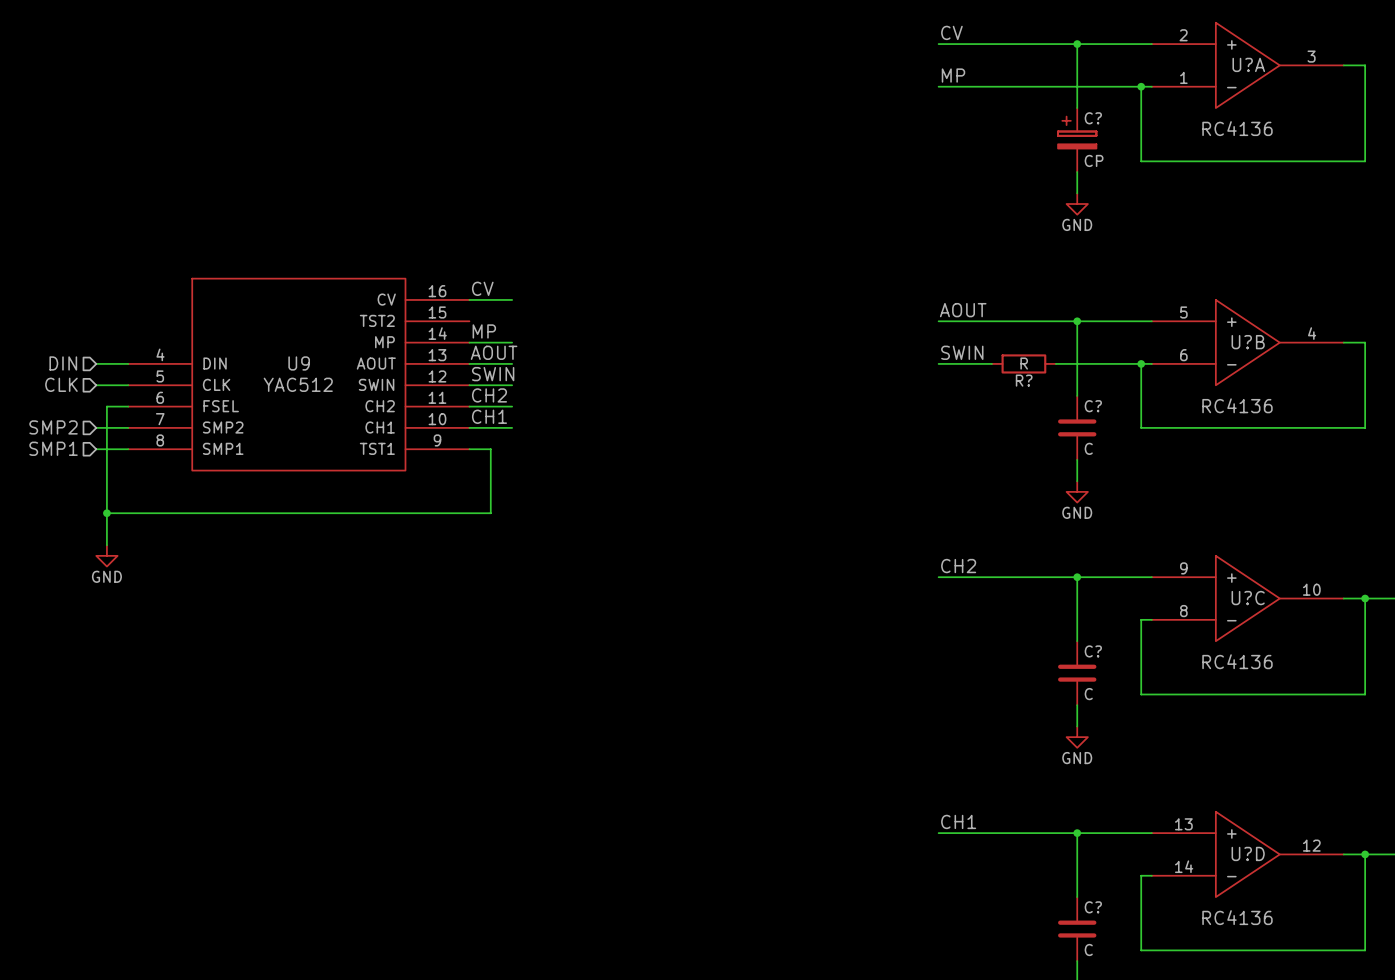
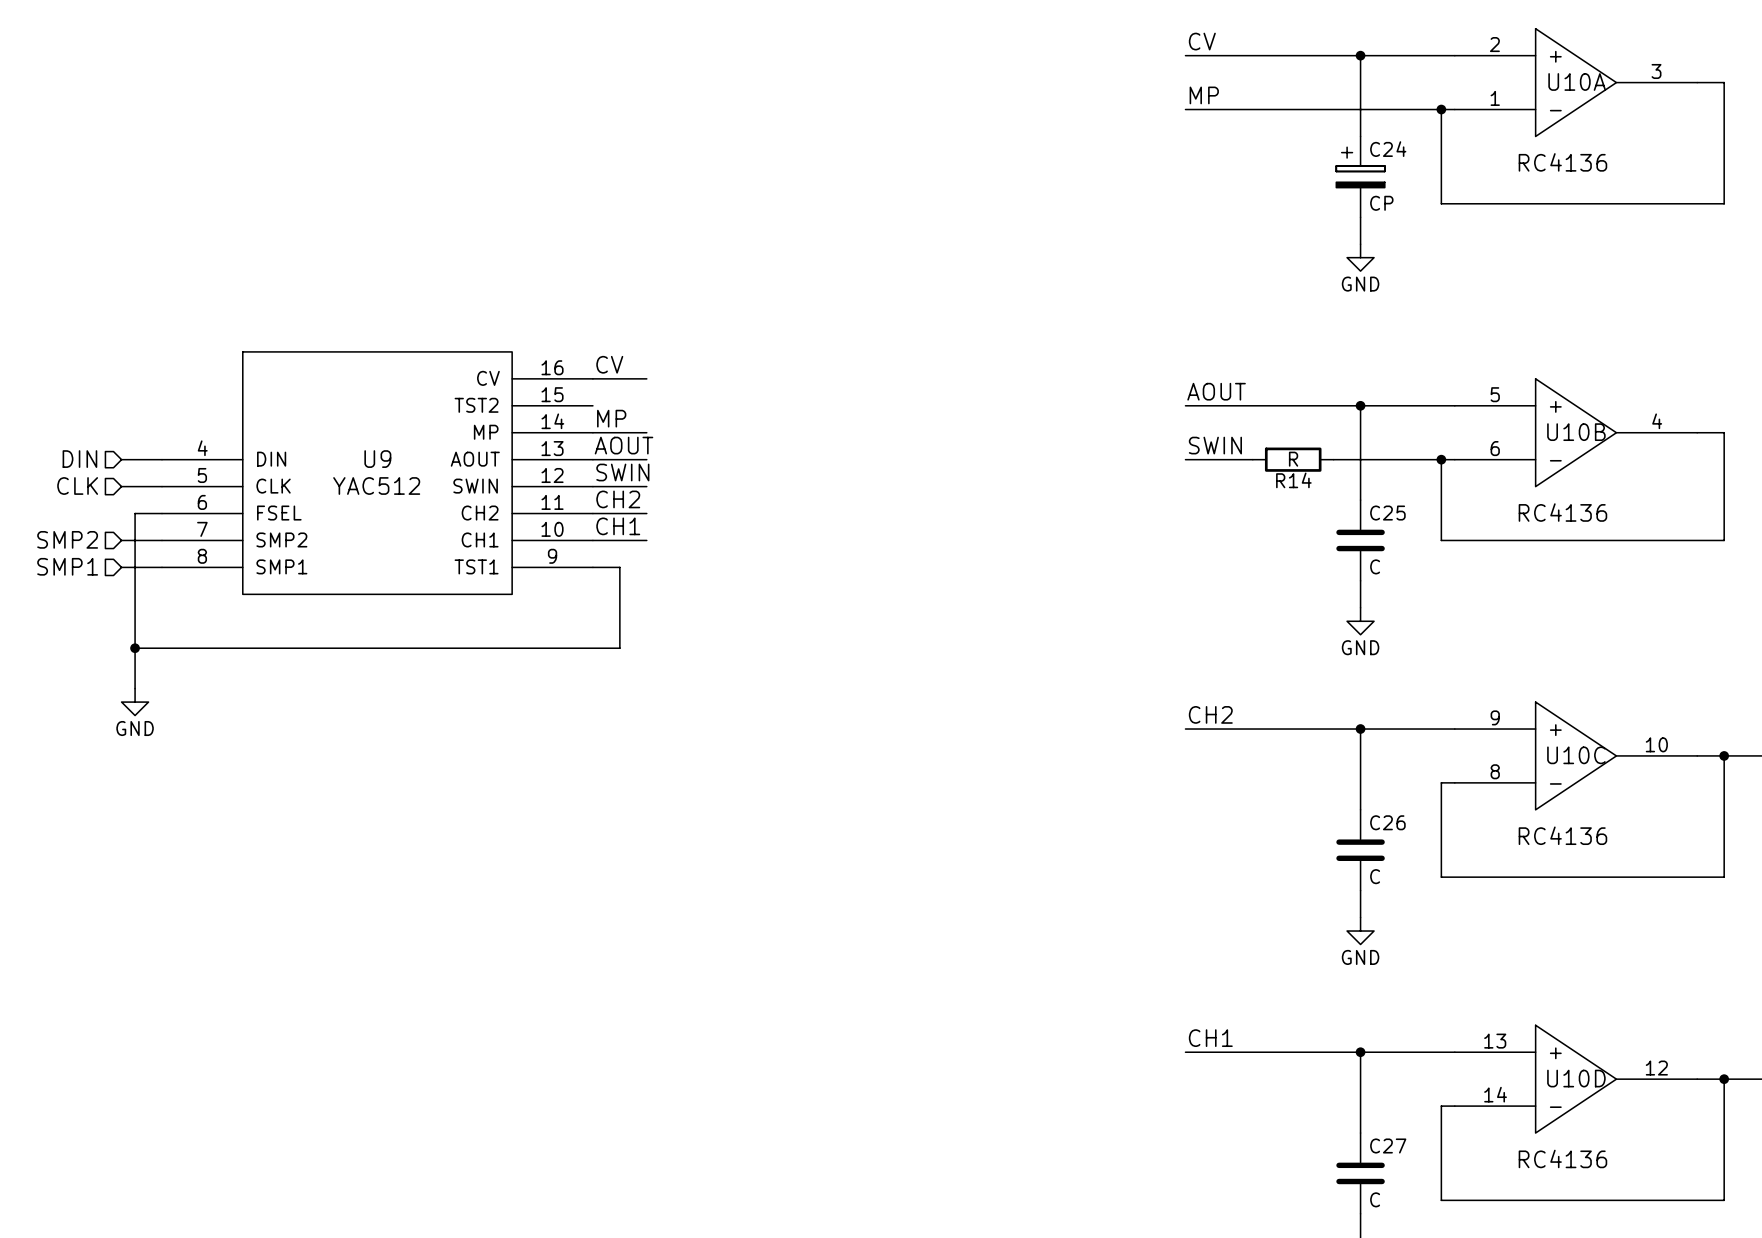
U?A name: U?A (1248, 64) -> U10A (1577, 81)
C? name: C? (1093, 118) -> C24 (1388, 149)
U?B name: U?B (1248, 342) -> U10B (1576, 432)
R? name: R? (1024, 380) -> R14 (1293, 480)
C? name: C? (1093, 406) -> C25 (1387, 513)
U?C name: U?C (1248, 598) -> U10C (1576, 755)
C? name: C? (1093, 651) -> C26 (1387, 822)
U?D name: U?D (1248, 853) -> U10D (1576, 1078)
C? name: C? (1093, 907) -> C27 (1388, 1145)

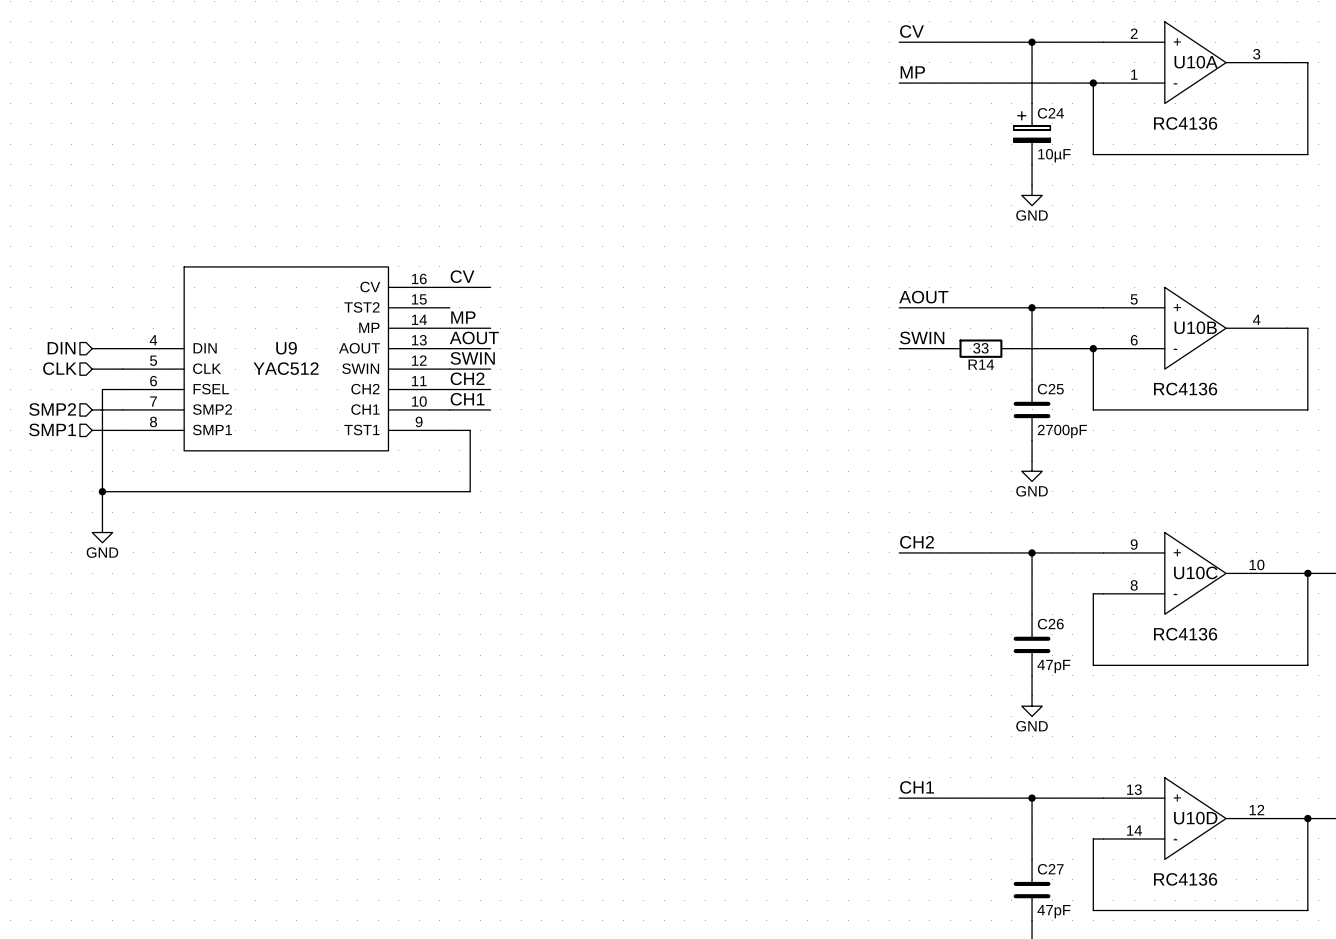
C24 value: CP (1381, 203) -> 10µF (1054, 155)
R14 value: R (1293, 459) -> 33 (980, 348)
C25 value: C (1375, 566) -> 2700pF (1062, 431)
C26 value: C (1375, 876) -> 47pF (1053, 666)
C27 value: C (1375, 1199) -> 47pF (1053, 911)

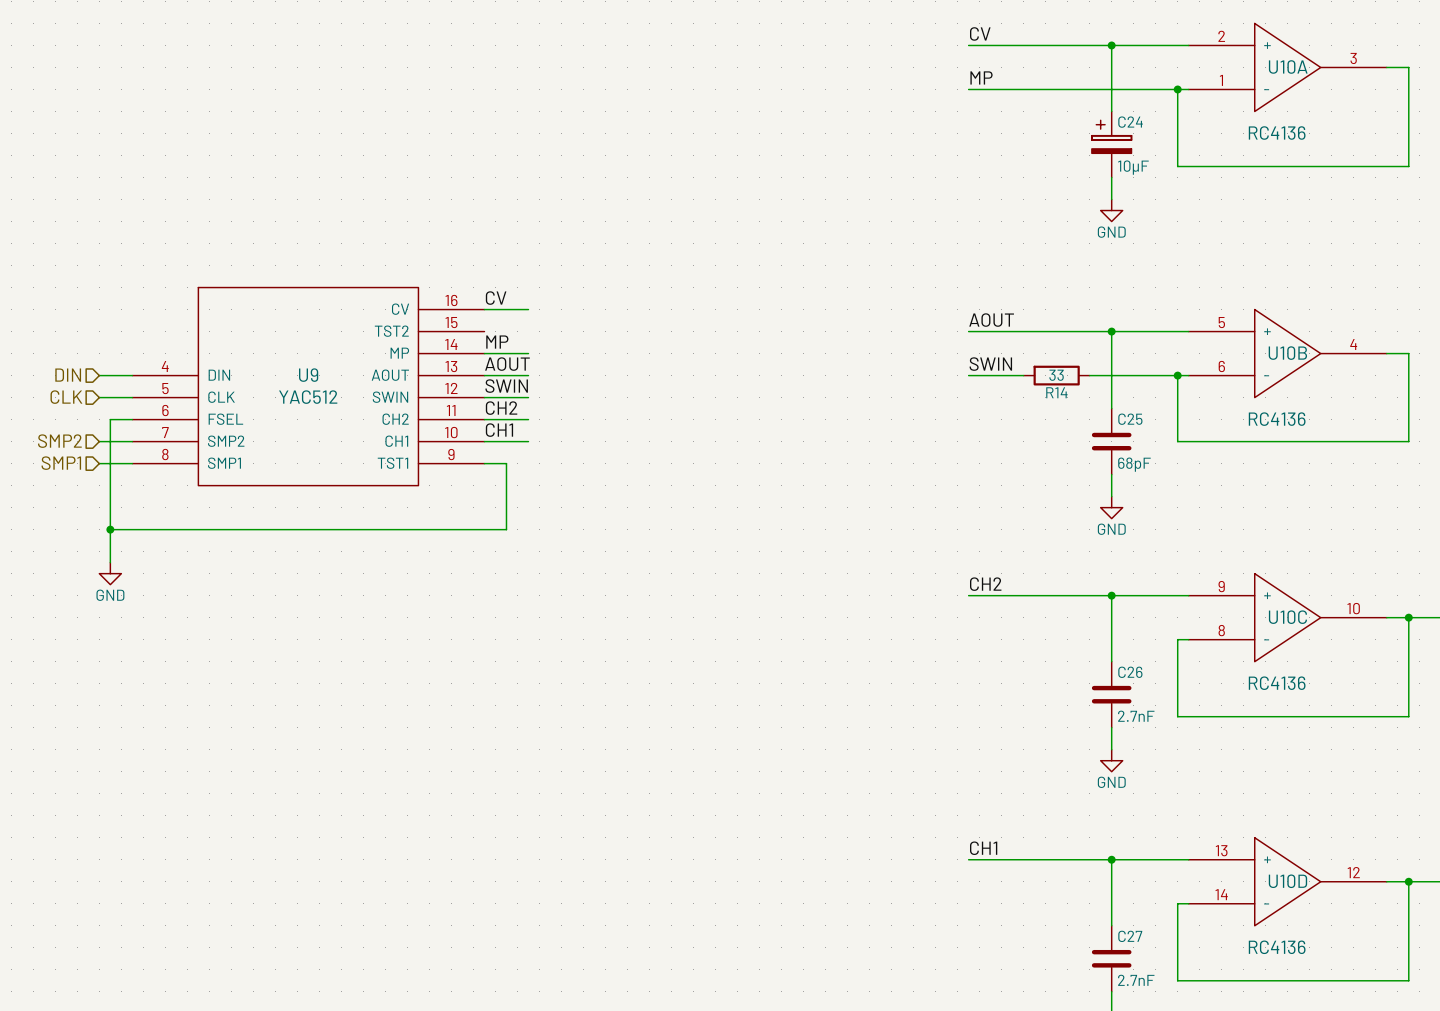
C25 value: 2700pF (1062, 431) -> 68pF (1134, 464)
C26 value: 47pF (1053, 666) -> 2.7nF (1136, 716)
C27 value: 47pF (1053, 911) -> 2.7nF (1136, 980)

